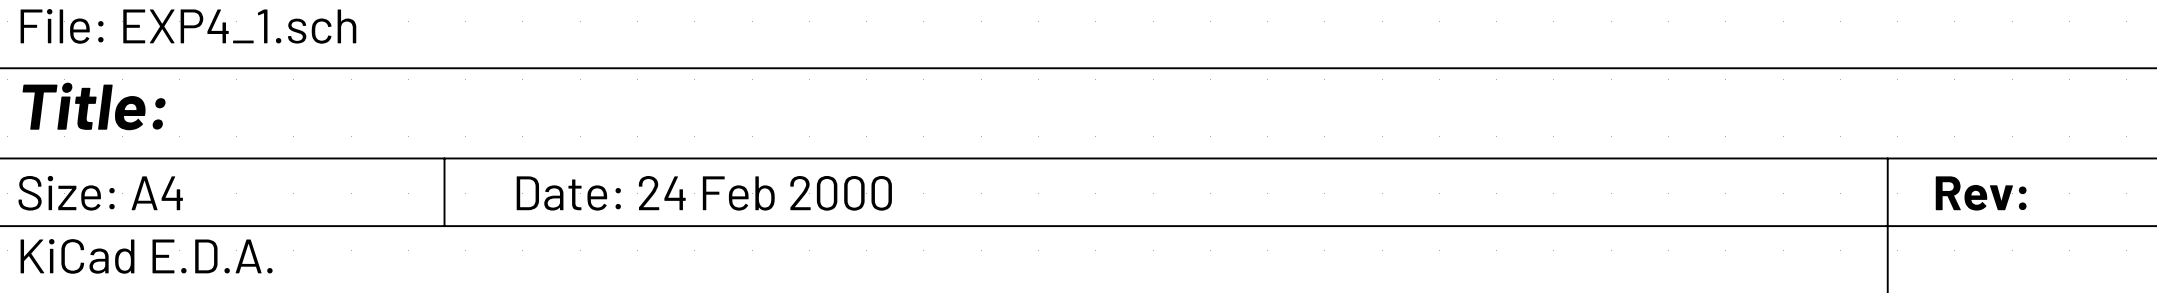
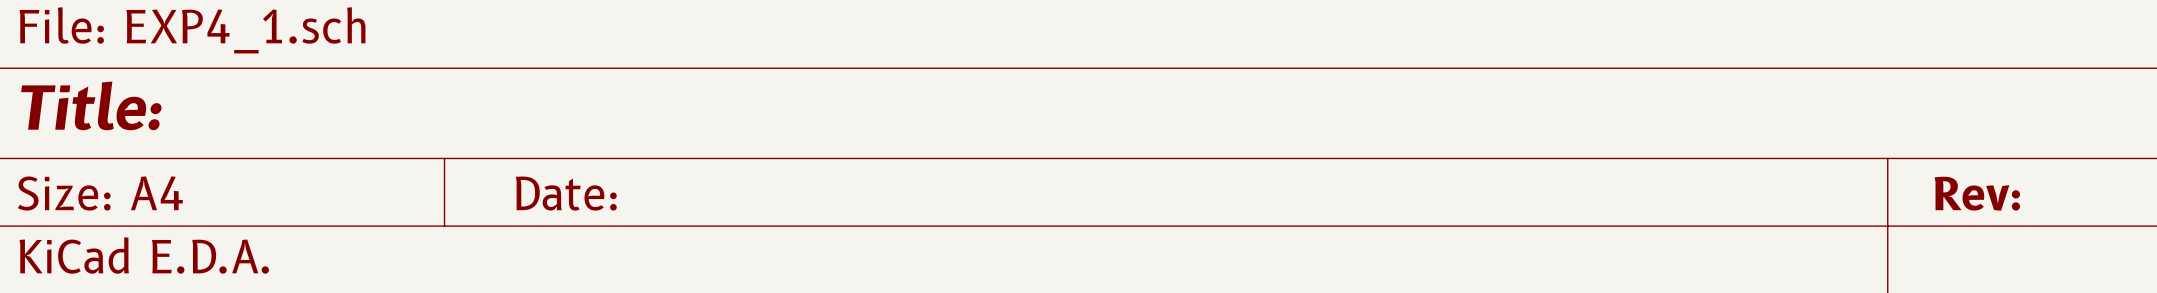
title block: Date: 24 Feb 2000 (704, 193) -> Date: (566, 193)

